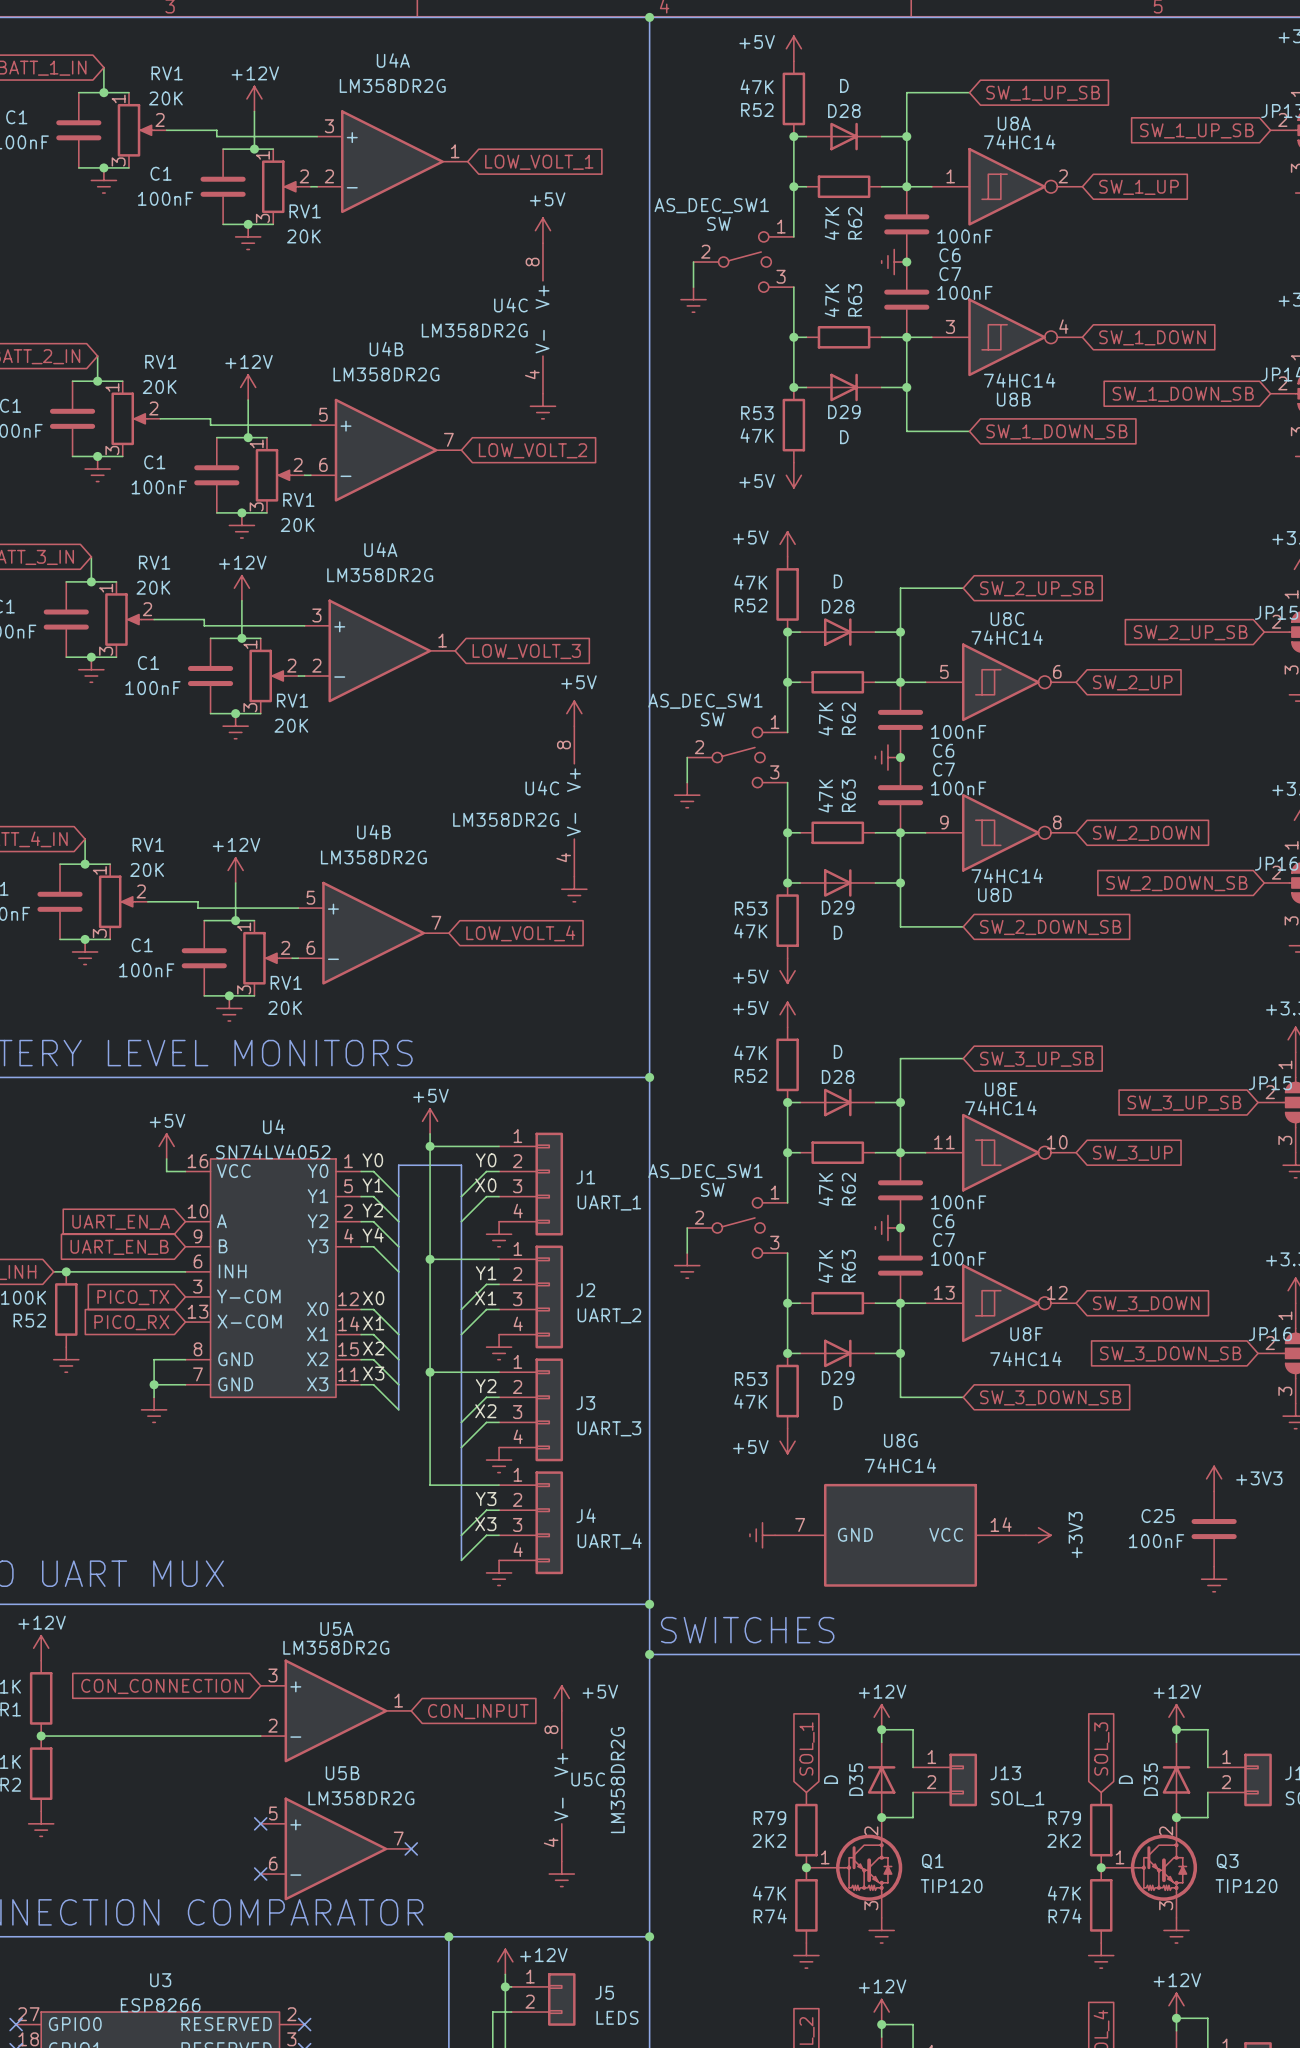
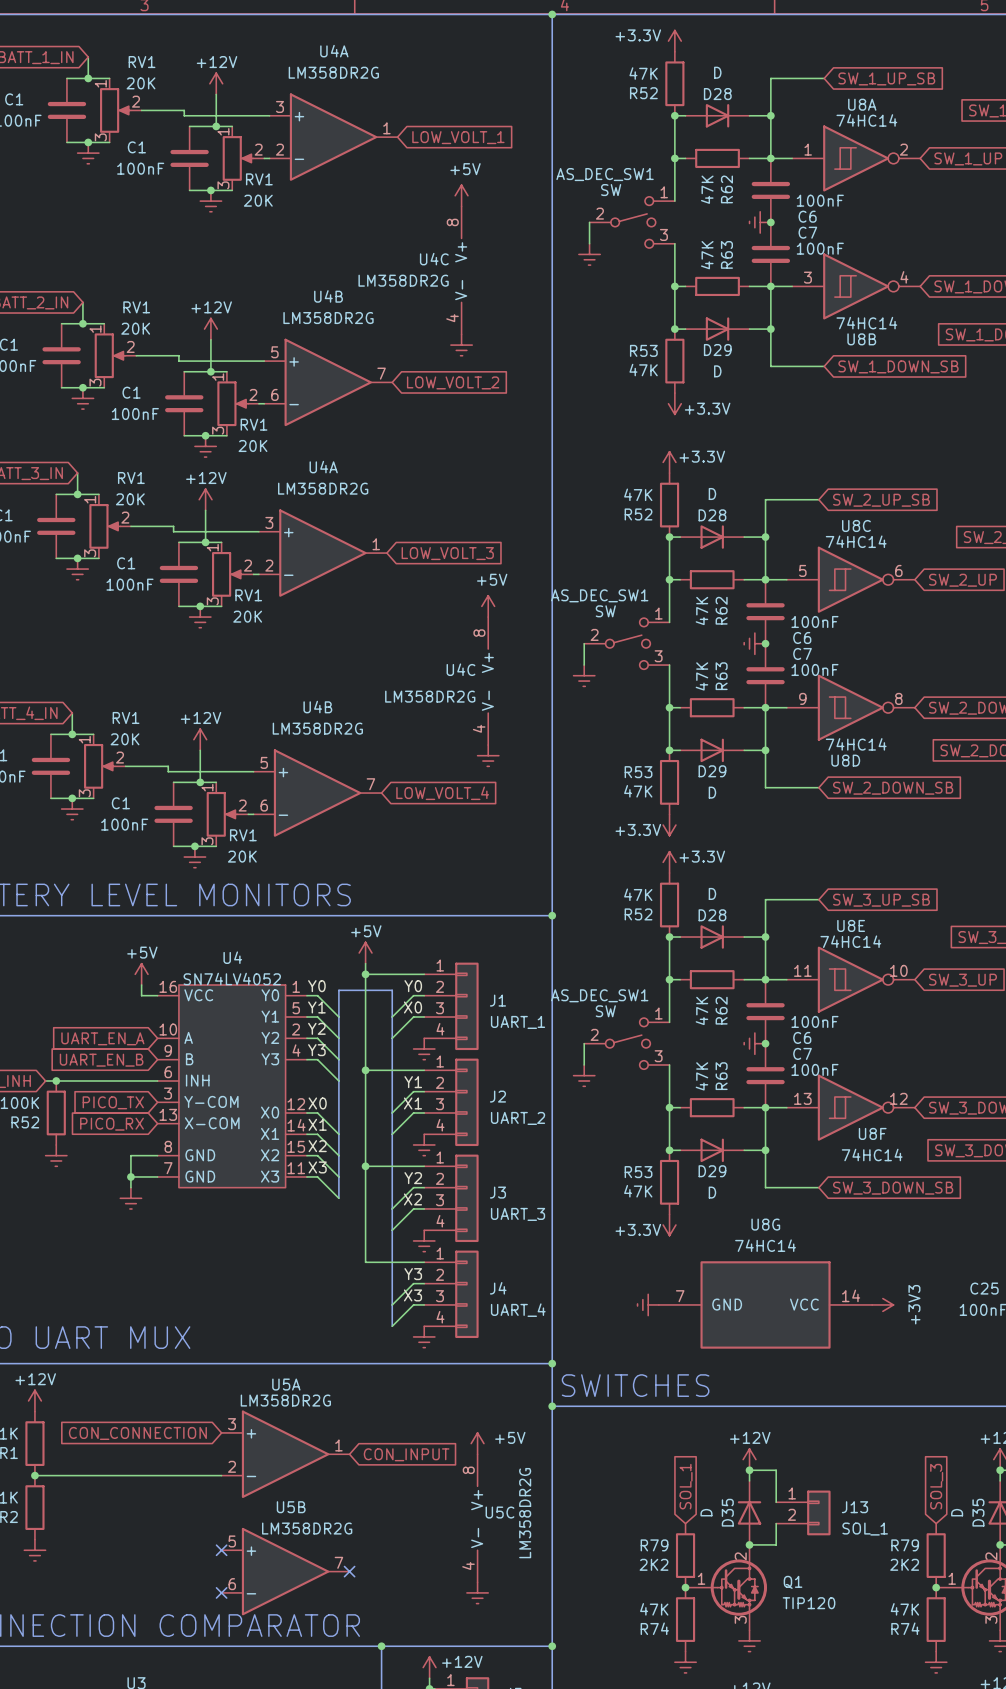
power symbol: +5V (793, 48) -> +3.3V (674, 41)
power symbol: +5V (793, 475) -> +3.3V (674, 403)
power symbol: +5V (787, 544) -> +3.3V (669, 462)
power symbol: +5V (787, 970) -> +3.3V (669, 825)
power symbol: +5V (787, 1014) -> +3.3V (669, 862)
label: Y4 (373, 1235) -> Y3 (316, 1050)
power symbol: +5V (787, 1441) -> +3.3V (669, 1224)

